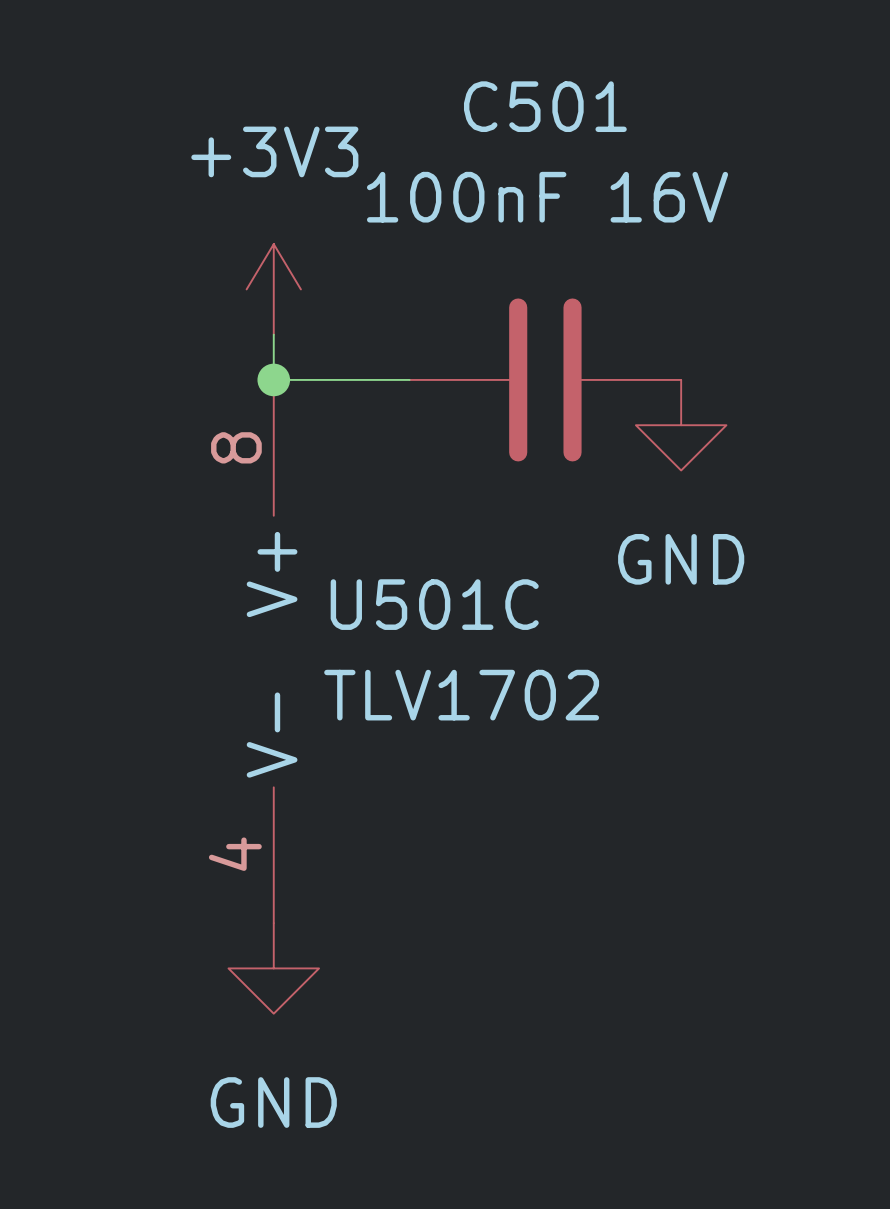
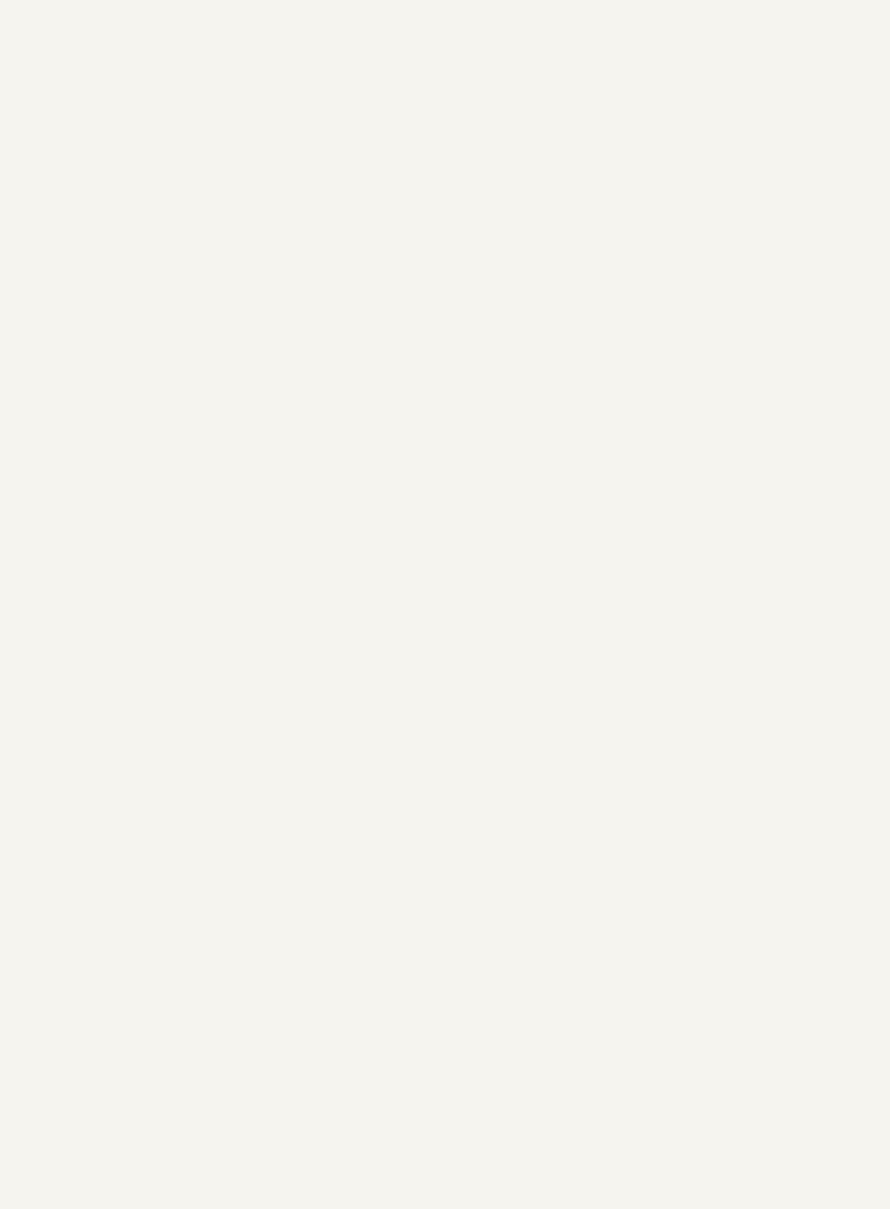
power symbol: +3V3 (273, 289) -> none
wire: (273, 334) (273, 379) (409, 379) -> none
junction: (273, 379) -> none
C501: 100nF 16V (545, 379) -> none
power symbol: GND (681, 425) -> none
U501C: TLV1702 (273, 651) -> none
power symbol: GND (273, 968) -> none

